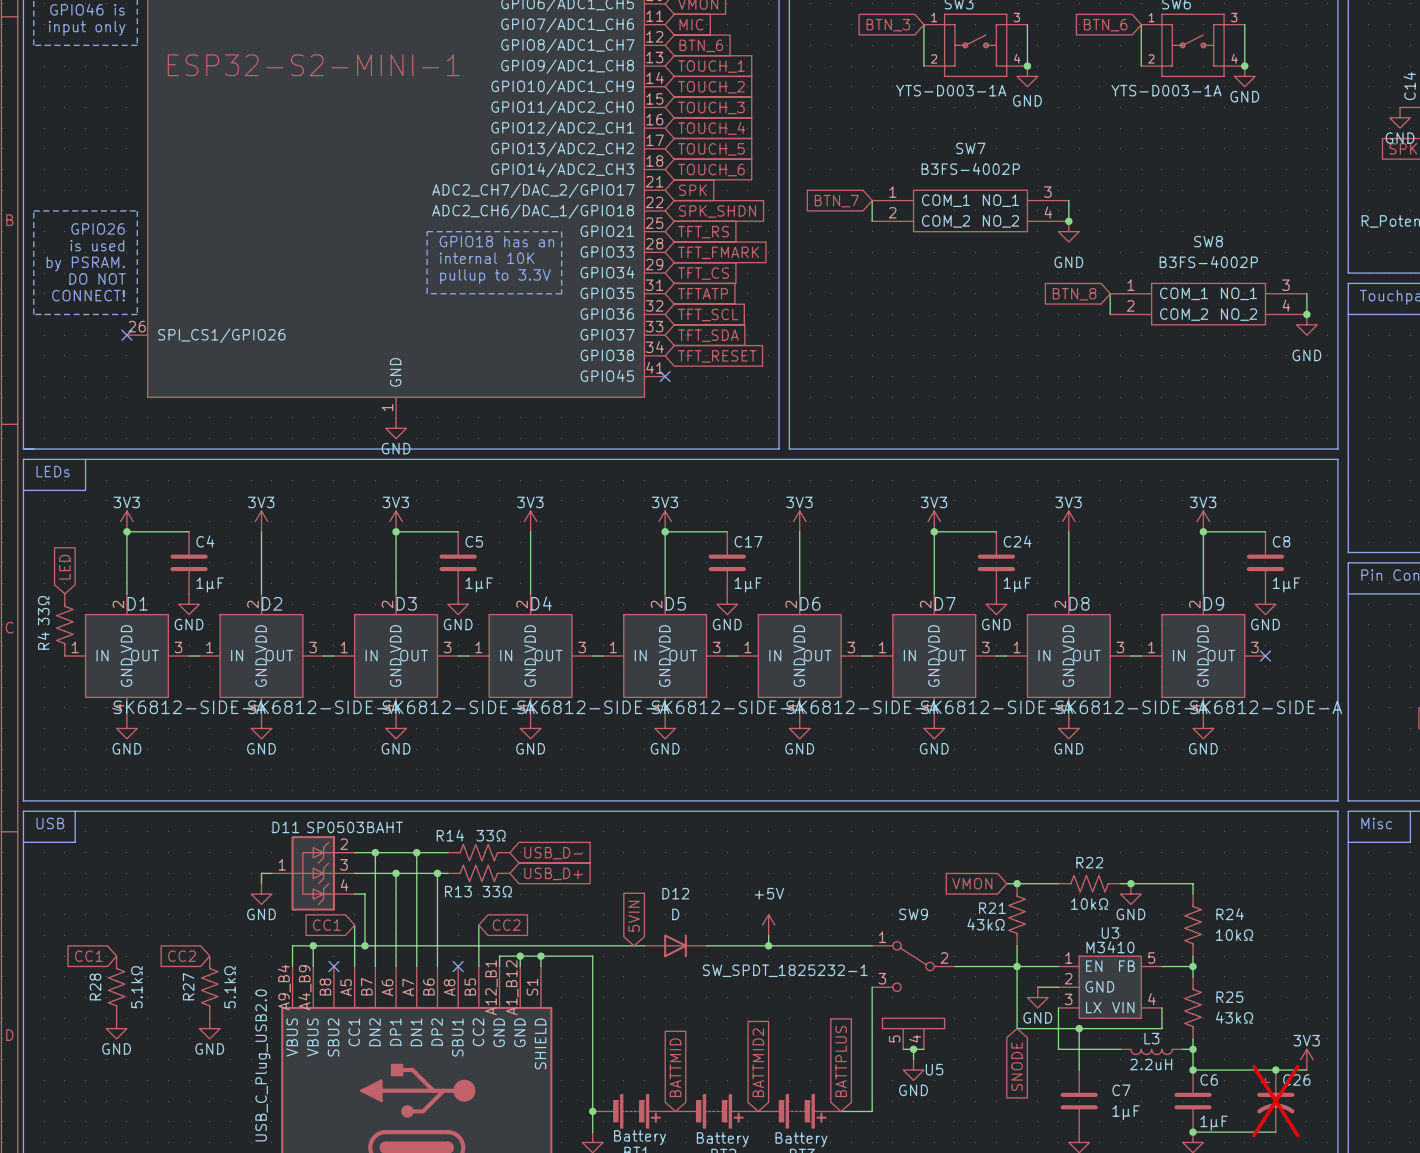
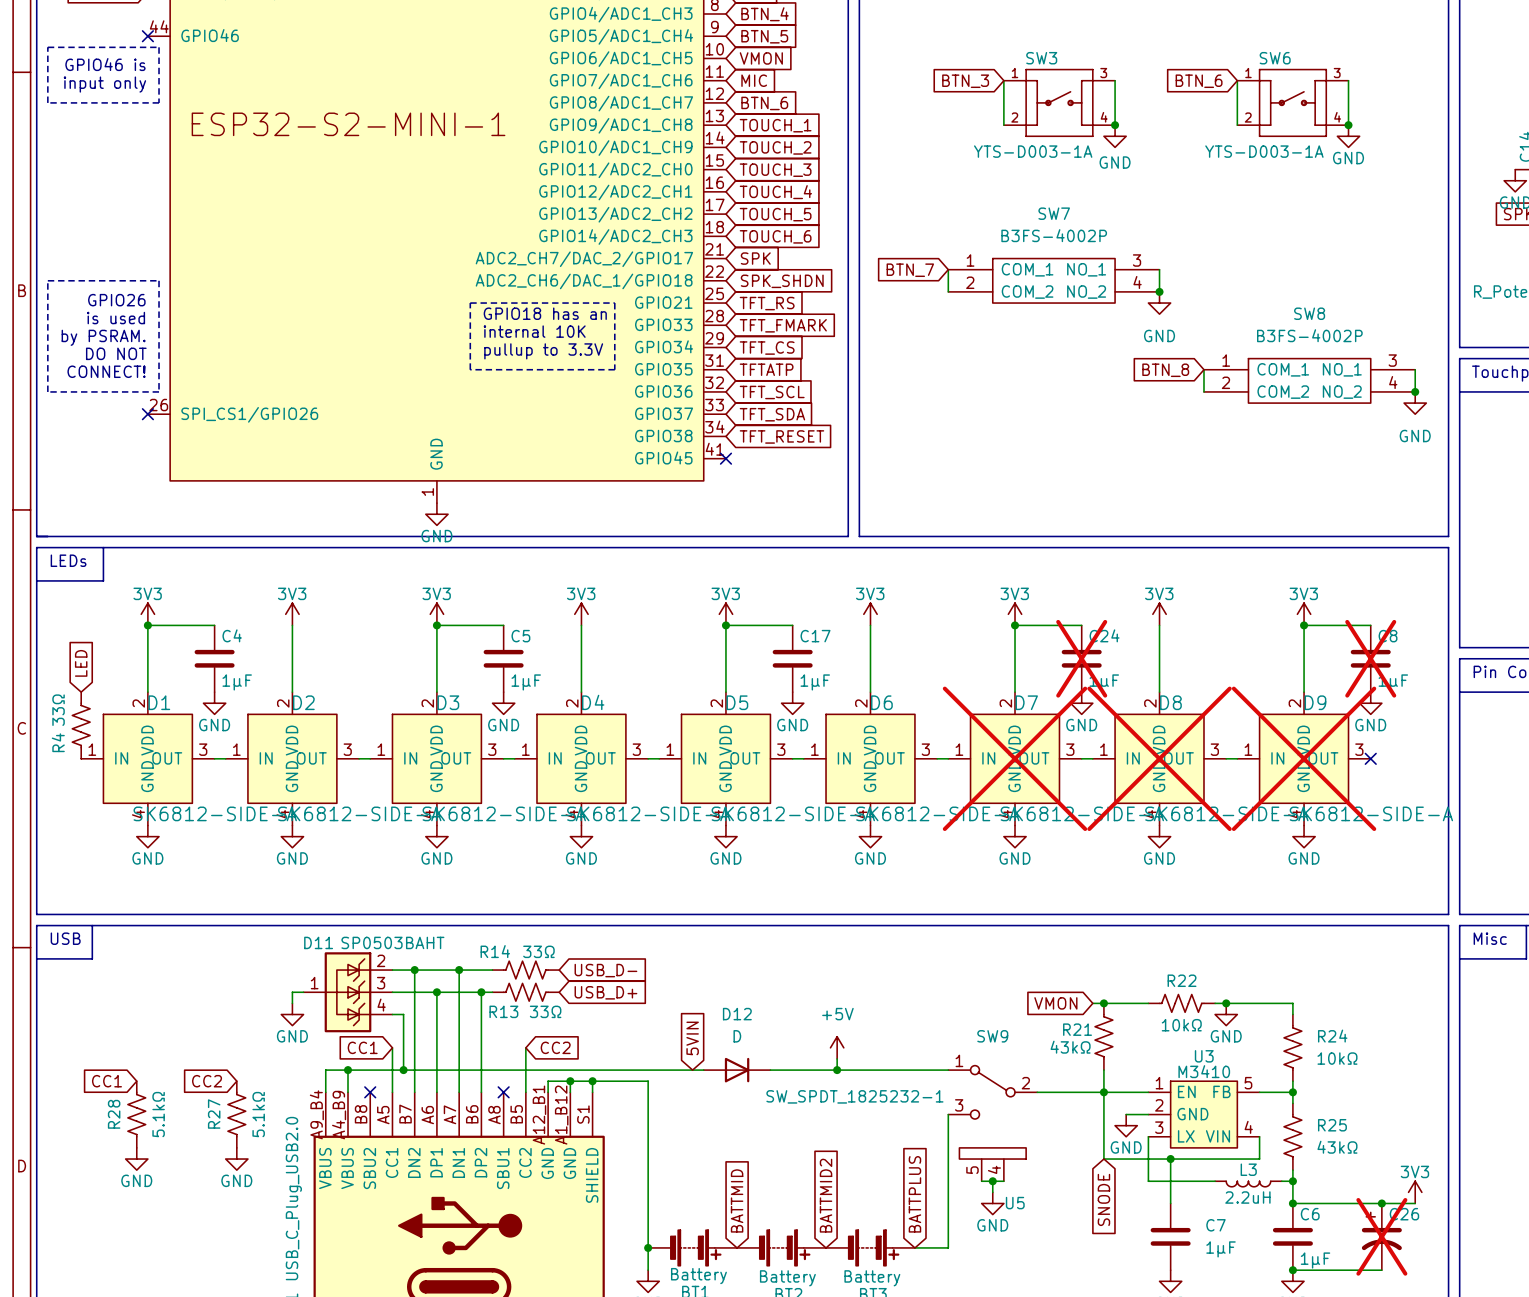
C24 do-not-place cross: none -> (1081, 658)
C8 do-not-place cross: none -> (1370, 658)
D7 do-not-place cross: none -> (1015, 758)
D8 do-not-place cross: none -> (1159, 758)
D9 do-not-place cross: none -> (1304, 758)

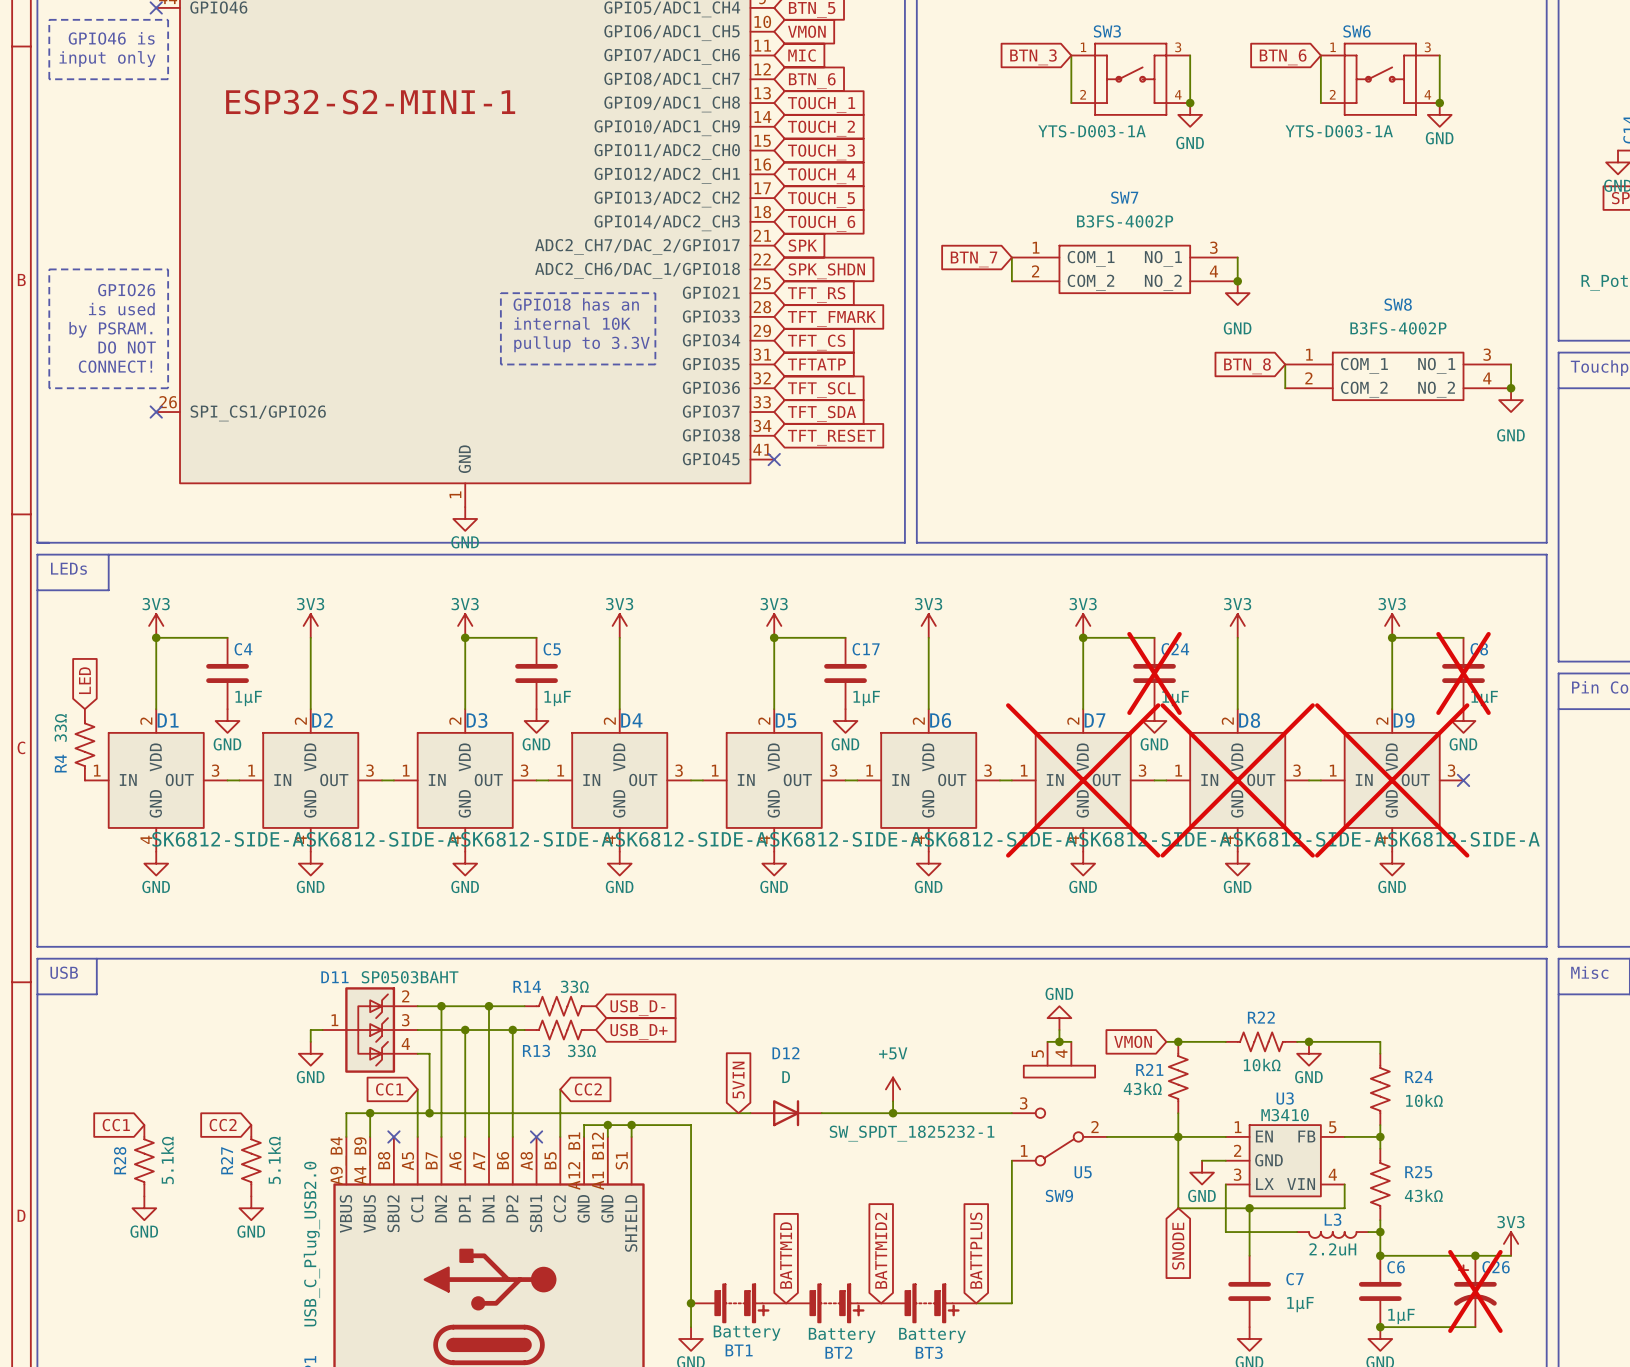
power symbol: none -> GND (1059, 1018)
junction: none -> (1059, 1041)
SW9 flip: as is (992, 1112) -> up-down (1059, 1115)
wire: (981, 1181) (1003, 1181) -> (1047, 1041) (1071, 1041)
wire: (992, 1181) (992, 1192) -> (1059, 1030) (1059, 1041)
junction: (992, 1181) -> none
power symbol: GND (992, 1203) -> none
U5 name position: U5 (1015, 1203) -> U5 (1083, 1172)

